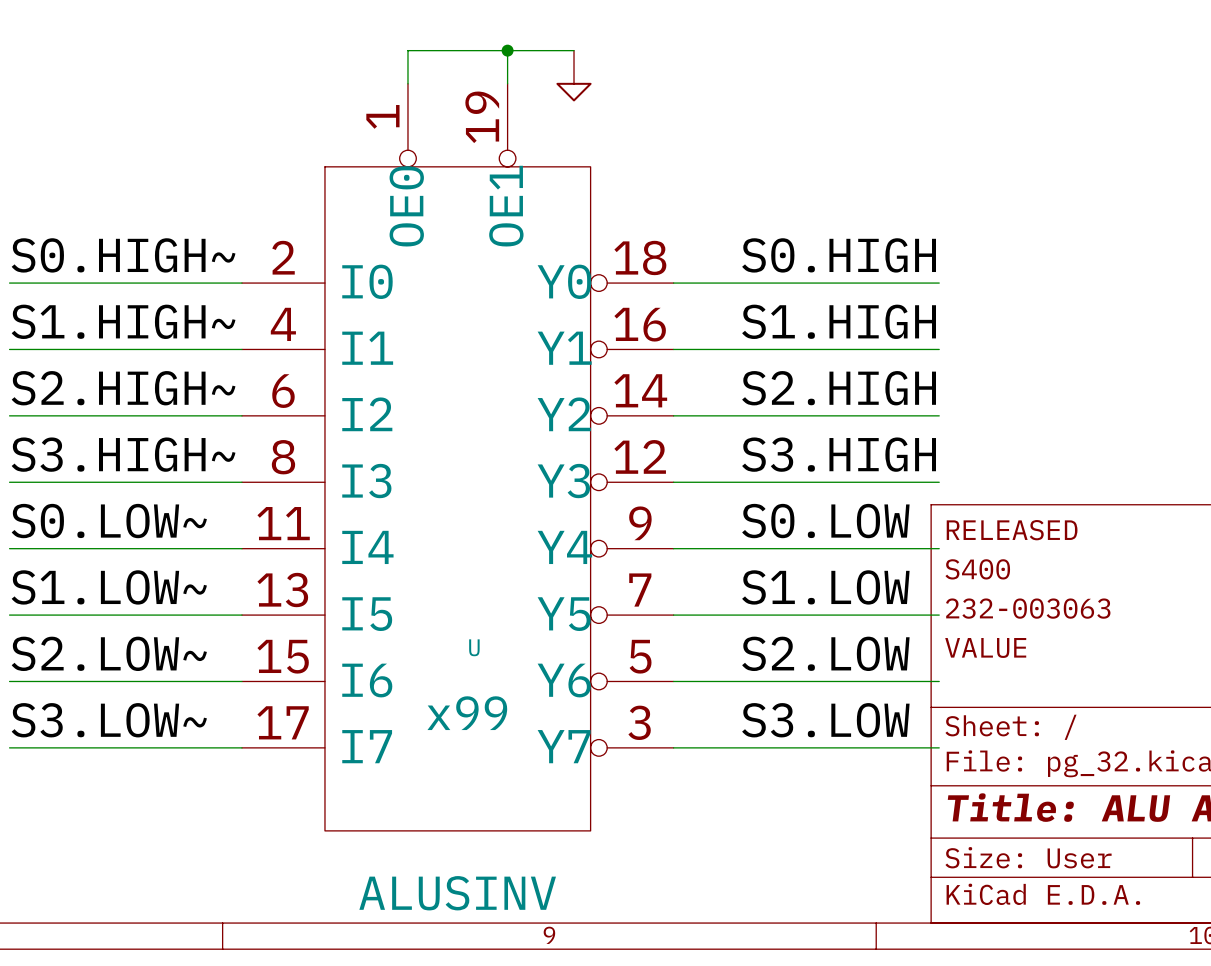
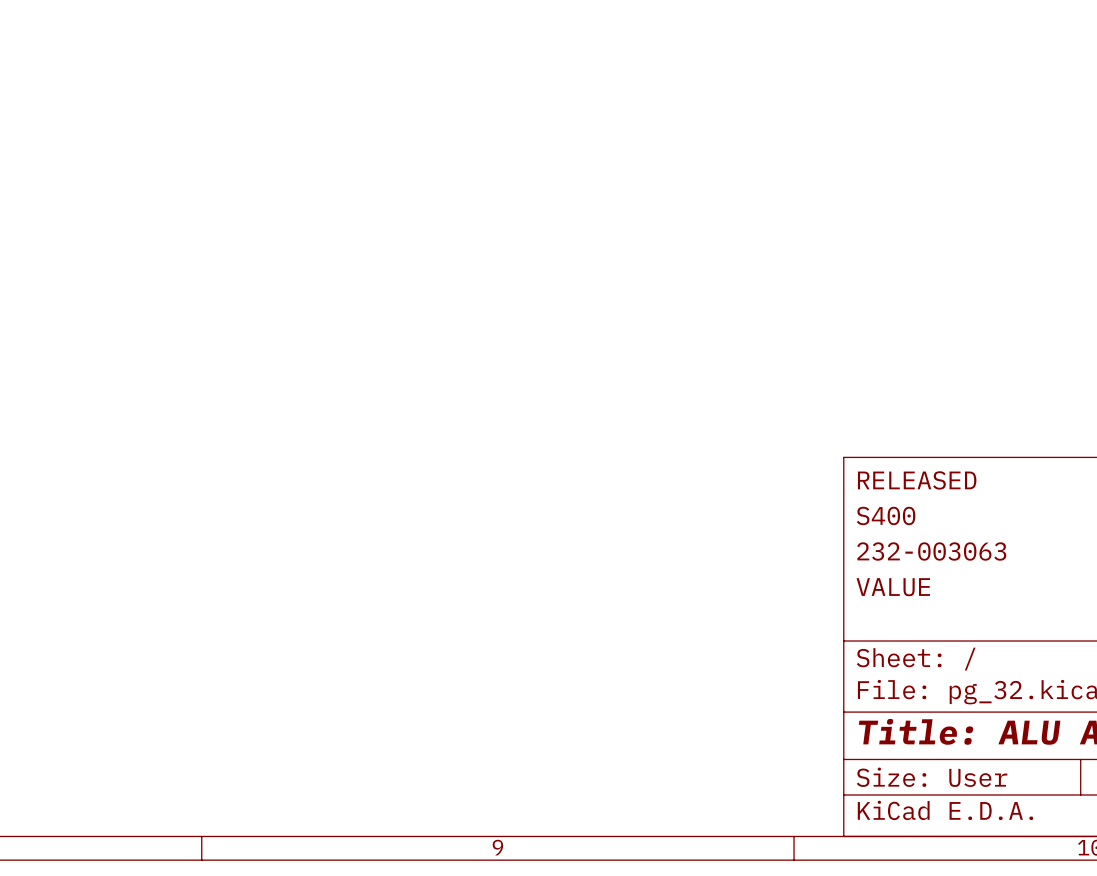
wire: (507, 50) (507, 83) -> none
junction: (507, 50) -> none
wire: (574, 50) (407, 50) (407, 83) -> none
power symbol: (574, 76) -> none
label: S0.HIGH~ (123, 255) -> none
label: S0.HIGH (839, 255) -> none
wire: (9, 283) (241, 283) -> none
wire: (673, 283) (939, 283) -> none
label: S1.HIGH~ (123, 321) -> none
label: S1.HIGH (839, 321) -> none
wire: (9, 349) (241, 349) -> none
wire: (673, 349) (939, 349) -> none
label: S2.HIGH~ (123, 388) -> none
label: S2.HIGH (839, 388) -> none
wire: (9, 415) (241, 415) -> none
wire: (673, 415) (939, 415) -> none
label: S3.HIGH~ (123, 454) -> none
label: S3.HIGH (839, 454) -> none
U: (457, 457) -> none
wire: (9, 482) (241, 482) -> none
wire: (673, 482) (939, 482) -> none
label: S0.LOW~ (109, 521) -> none
label: S0.LOW (825, 521) -> none
wire: (9, 548) (241, 548) -> none
wire: (673, 548) (939, 548) -> none
label: S1.LOW~ (109, 587) -> none
label: S1.LOW (825, 587) -> none
wire: (9, 615) (241, 615) -> none
wire: (673, 615) (939, 615) -> none
label: S2.LOW~ (109, 653) -> none
label: S2.LOW (825, 653) -> none
wire: (9, 681) (241, 681) -> none
wire: (673, 681) (939, 681) -> none
label: S3.LOW~ (109, 720) -> none
label: S3.LOW (825, 720) -> none
wire: (9, 747) (241, 747) -> none
wire: (673, 747) (939, 747) -> none

